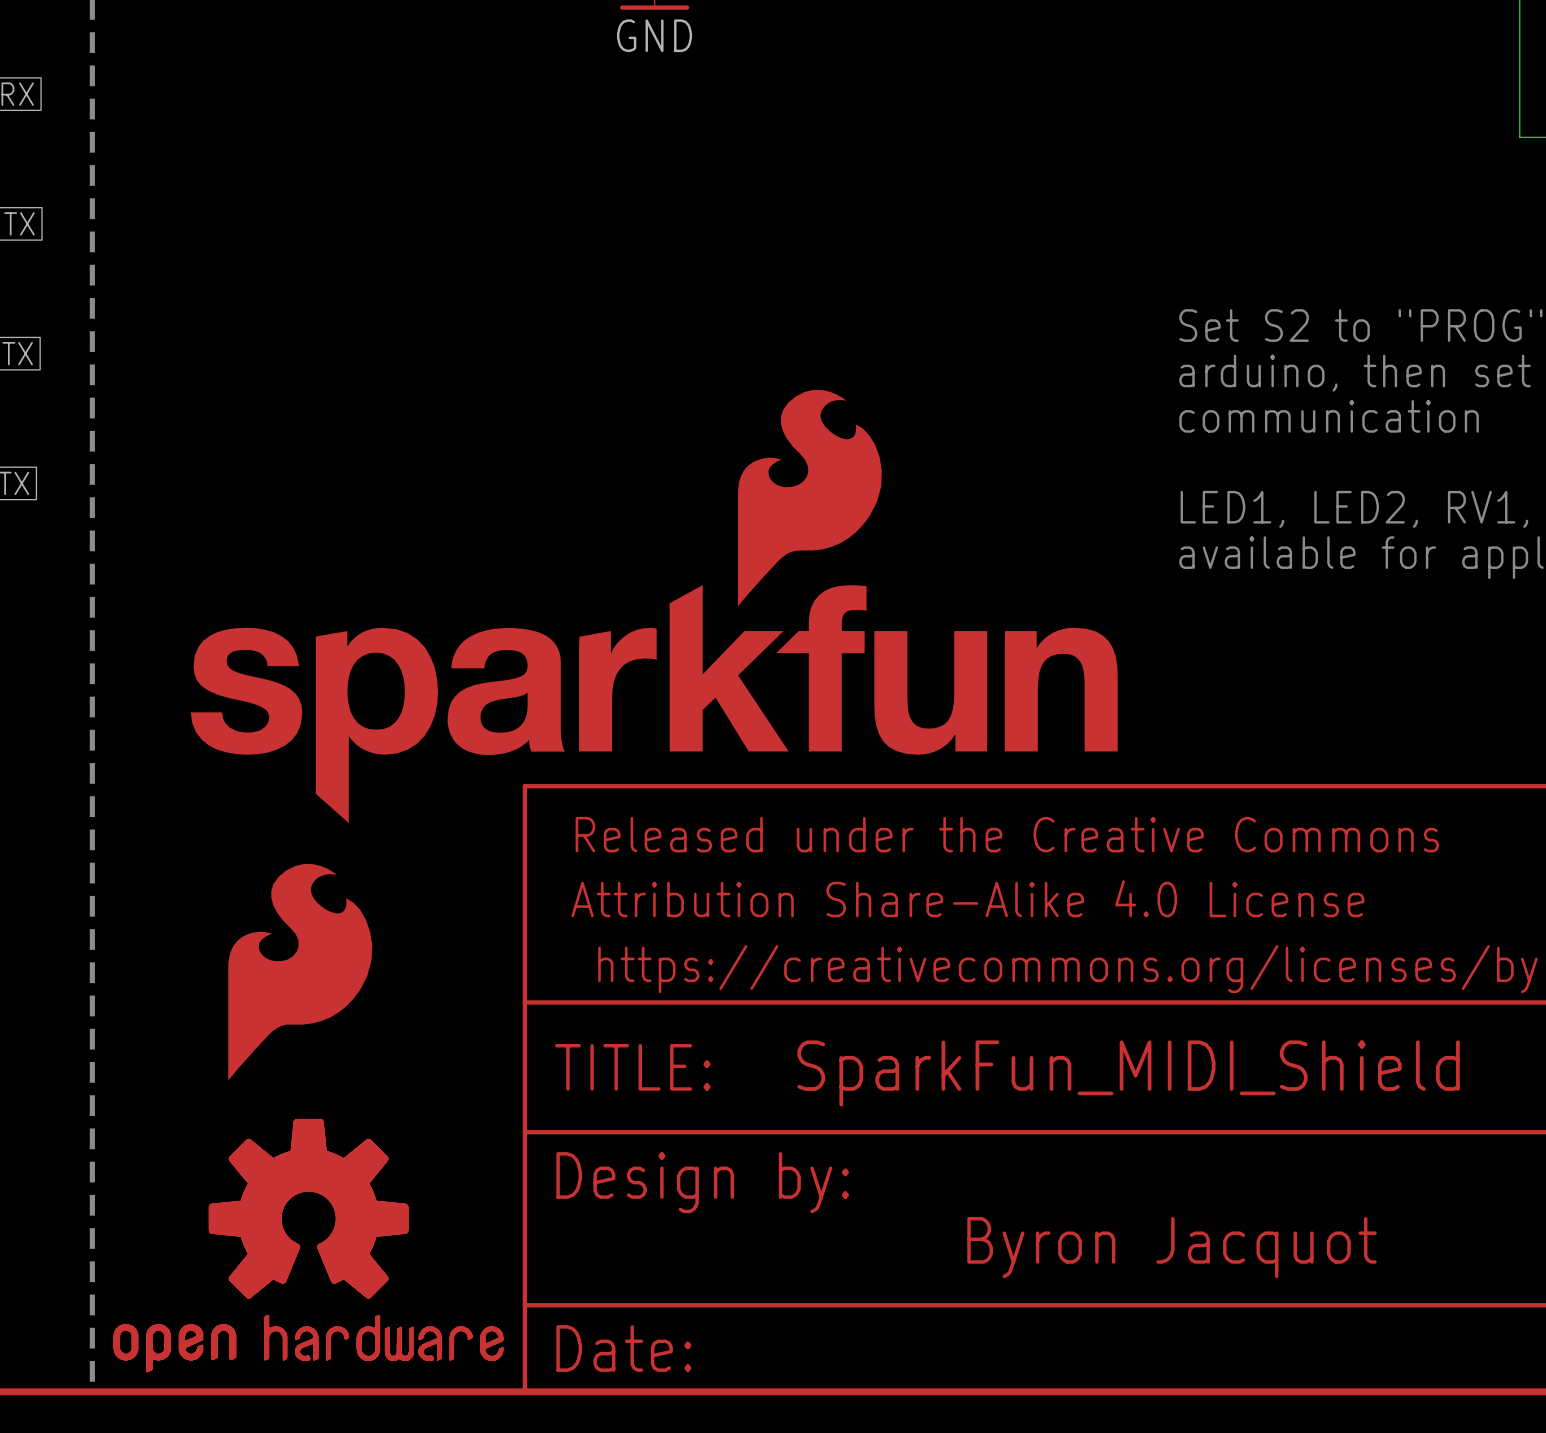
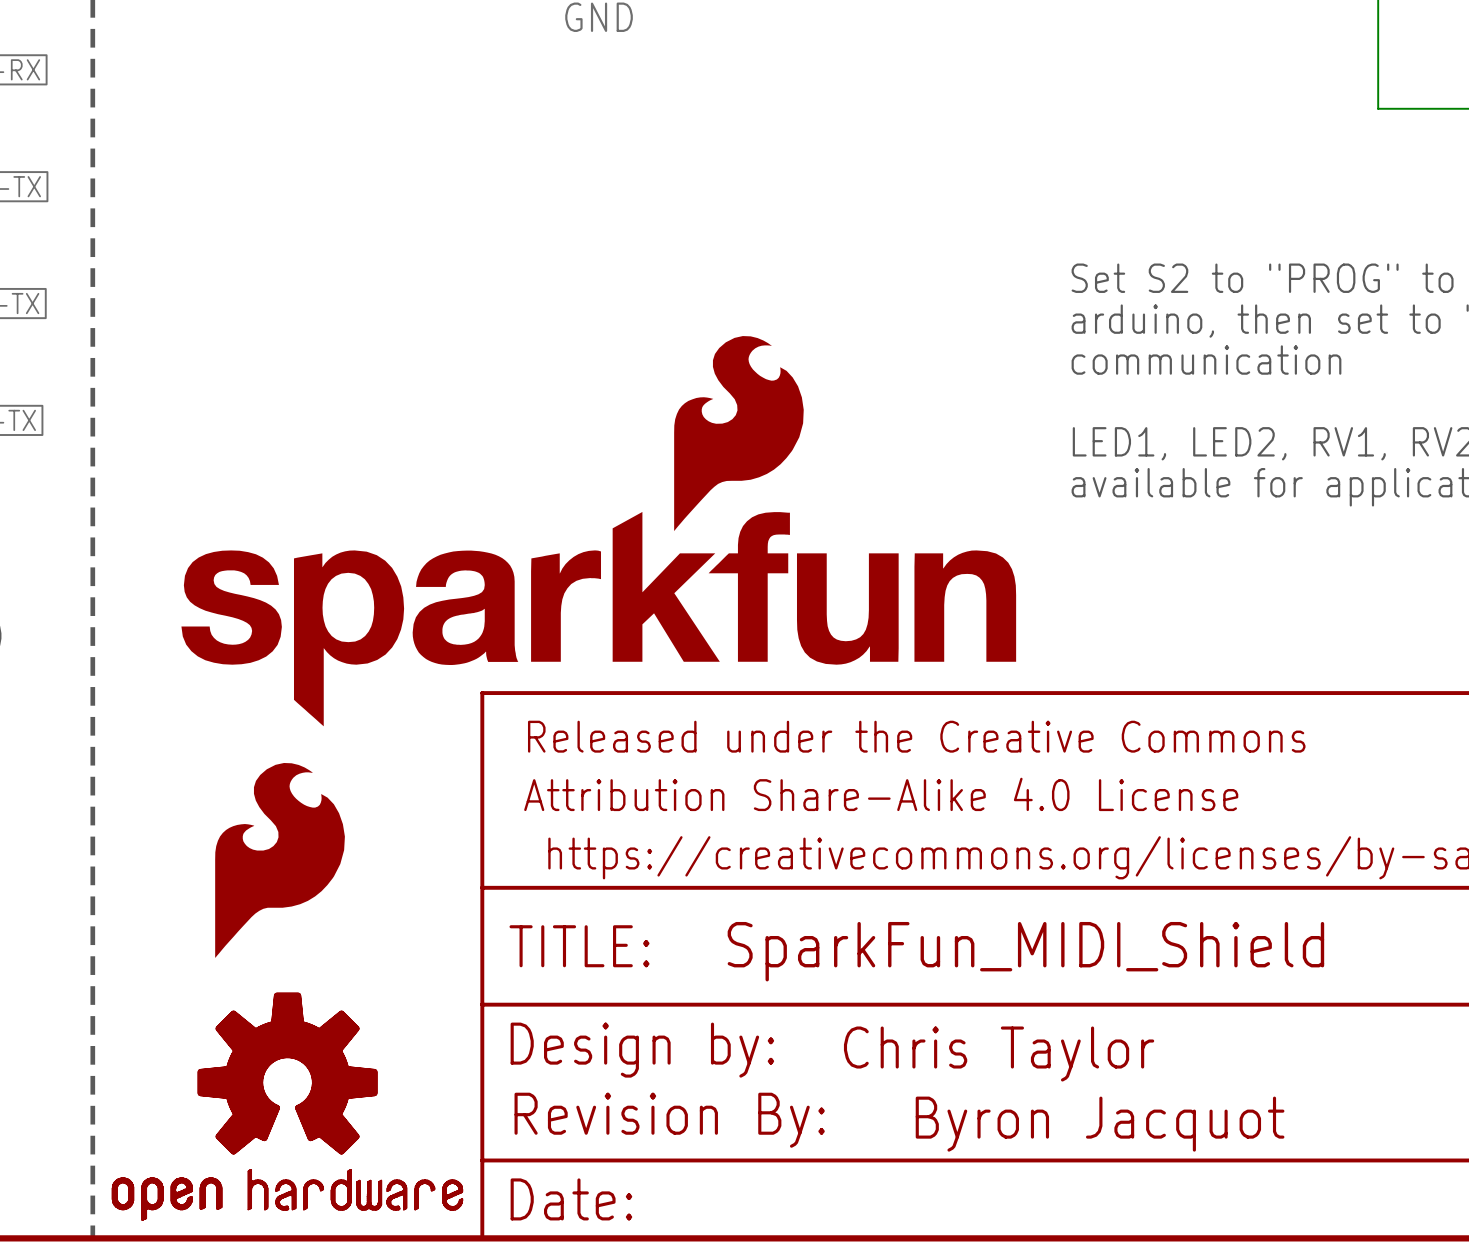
text: none -> Chris Taylor (999, 1054)
text position: Byron Jacquot (1171, 1247) -> Byron Jacquot (1100, 1124)
part: none -> (669, 1120)

